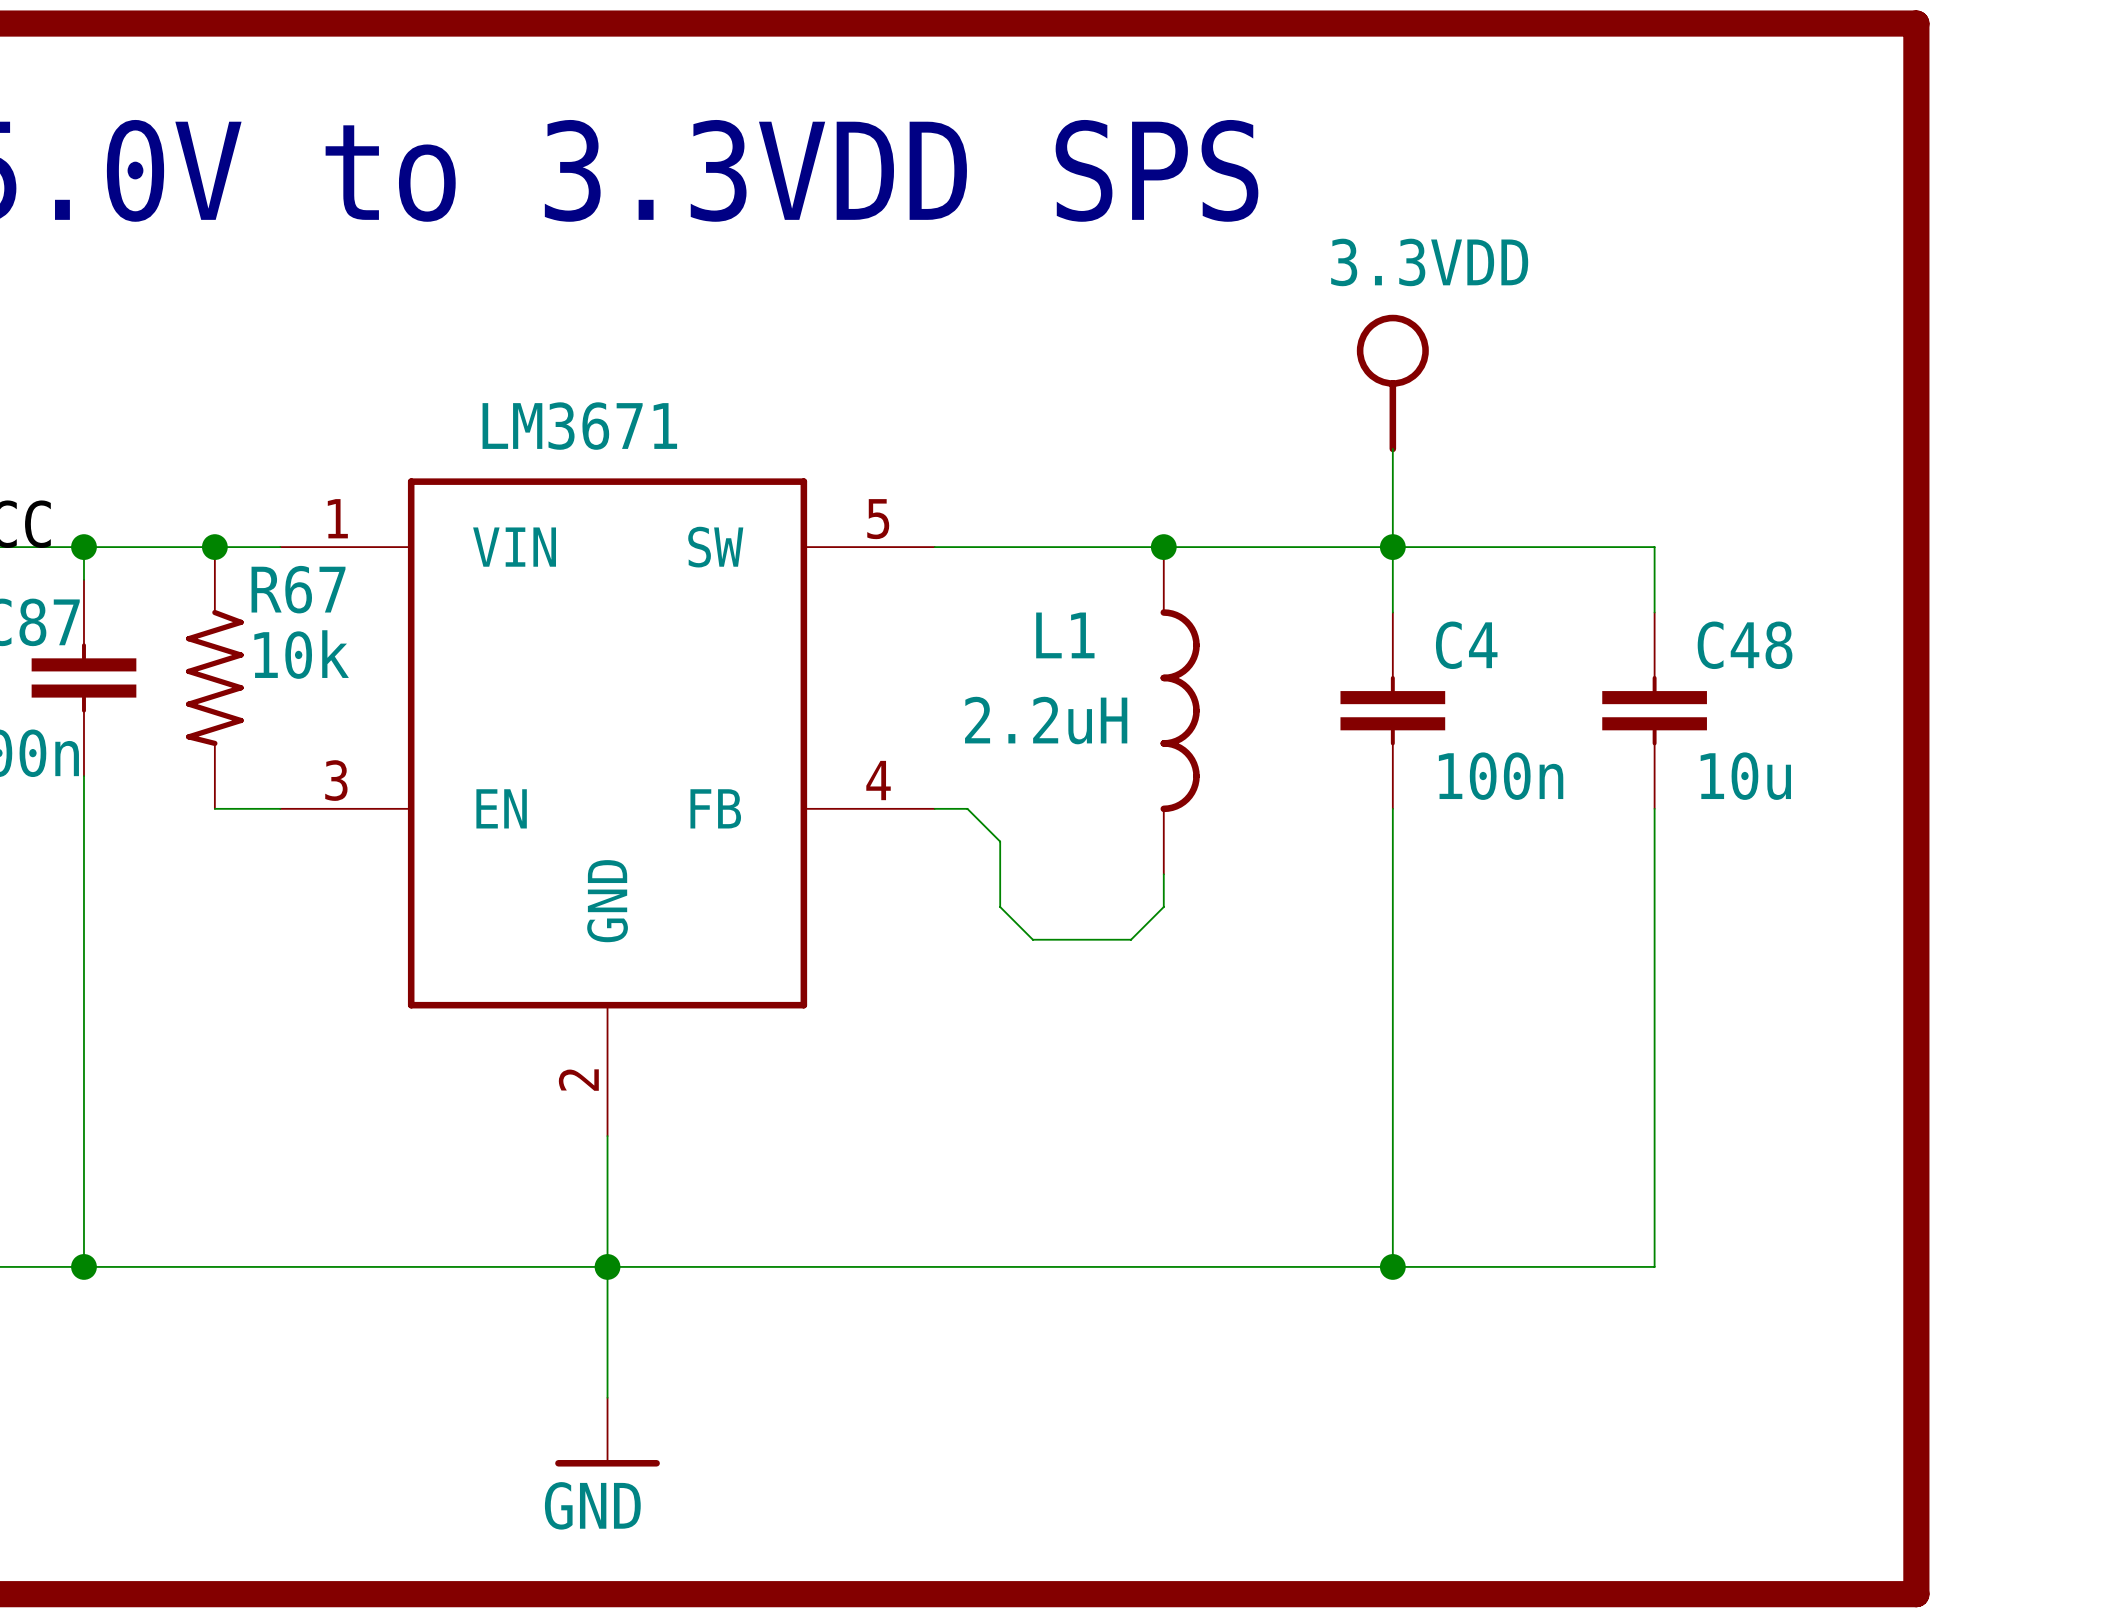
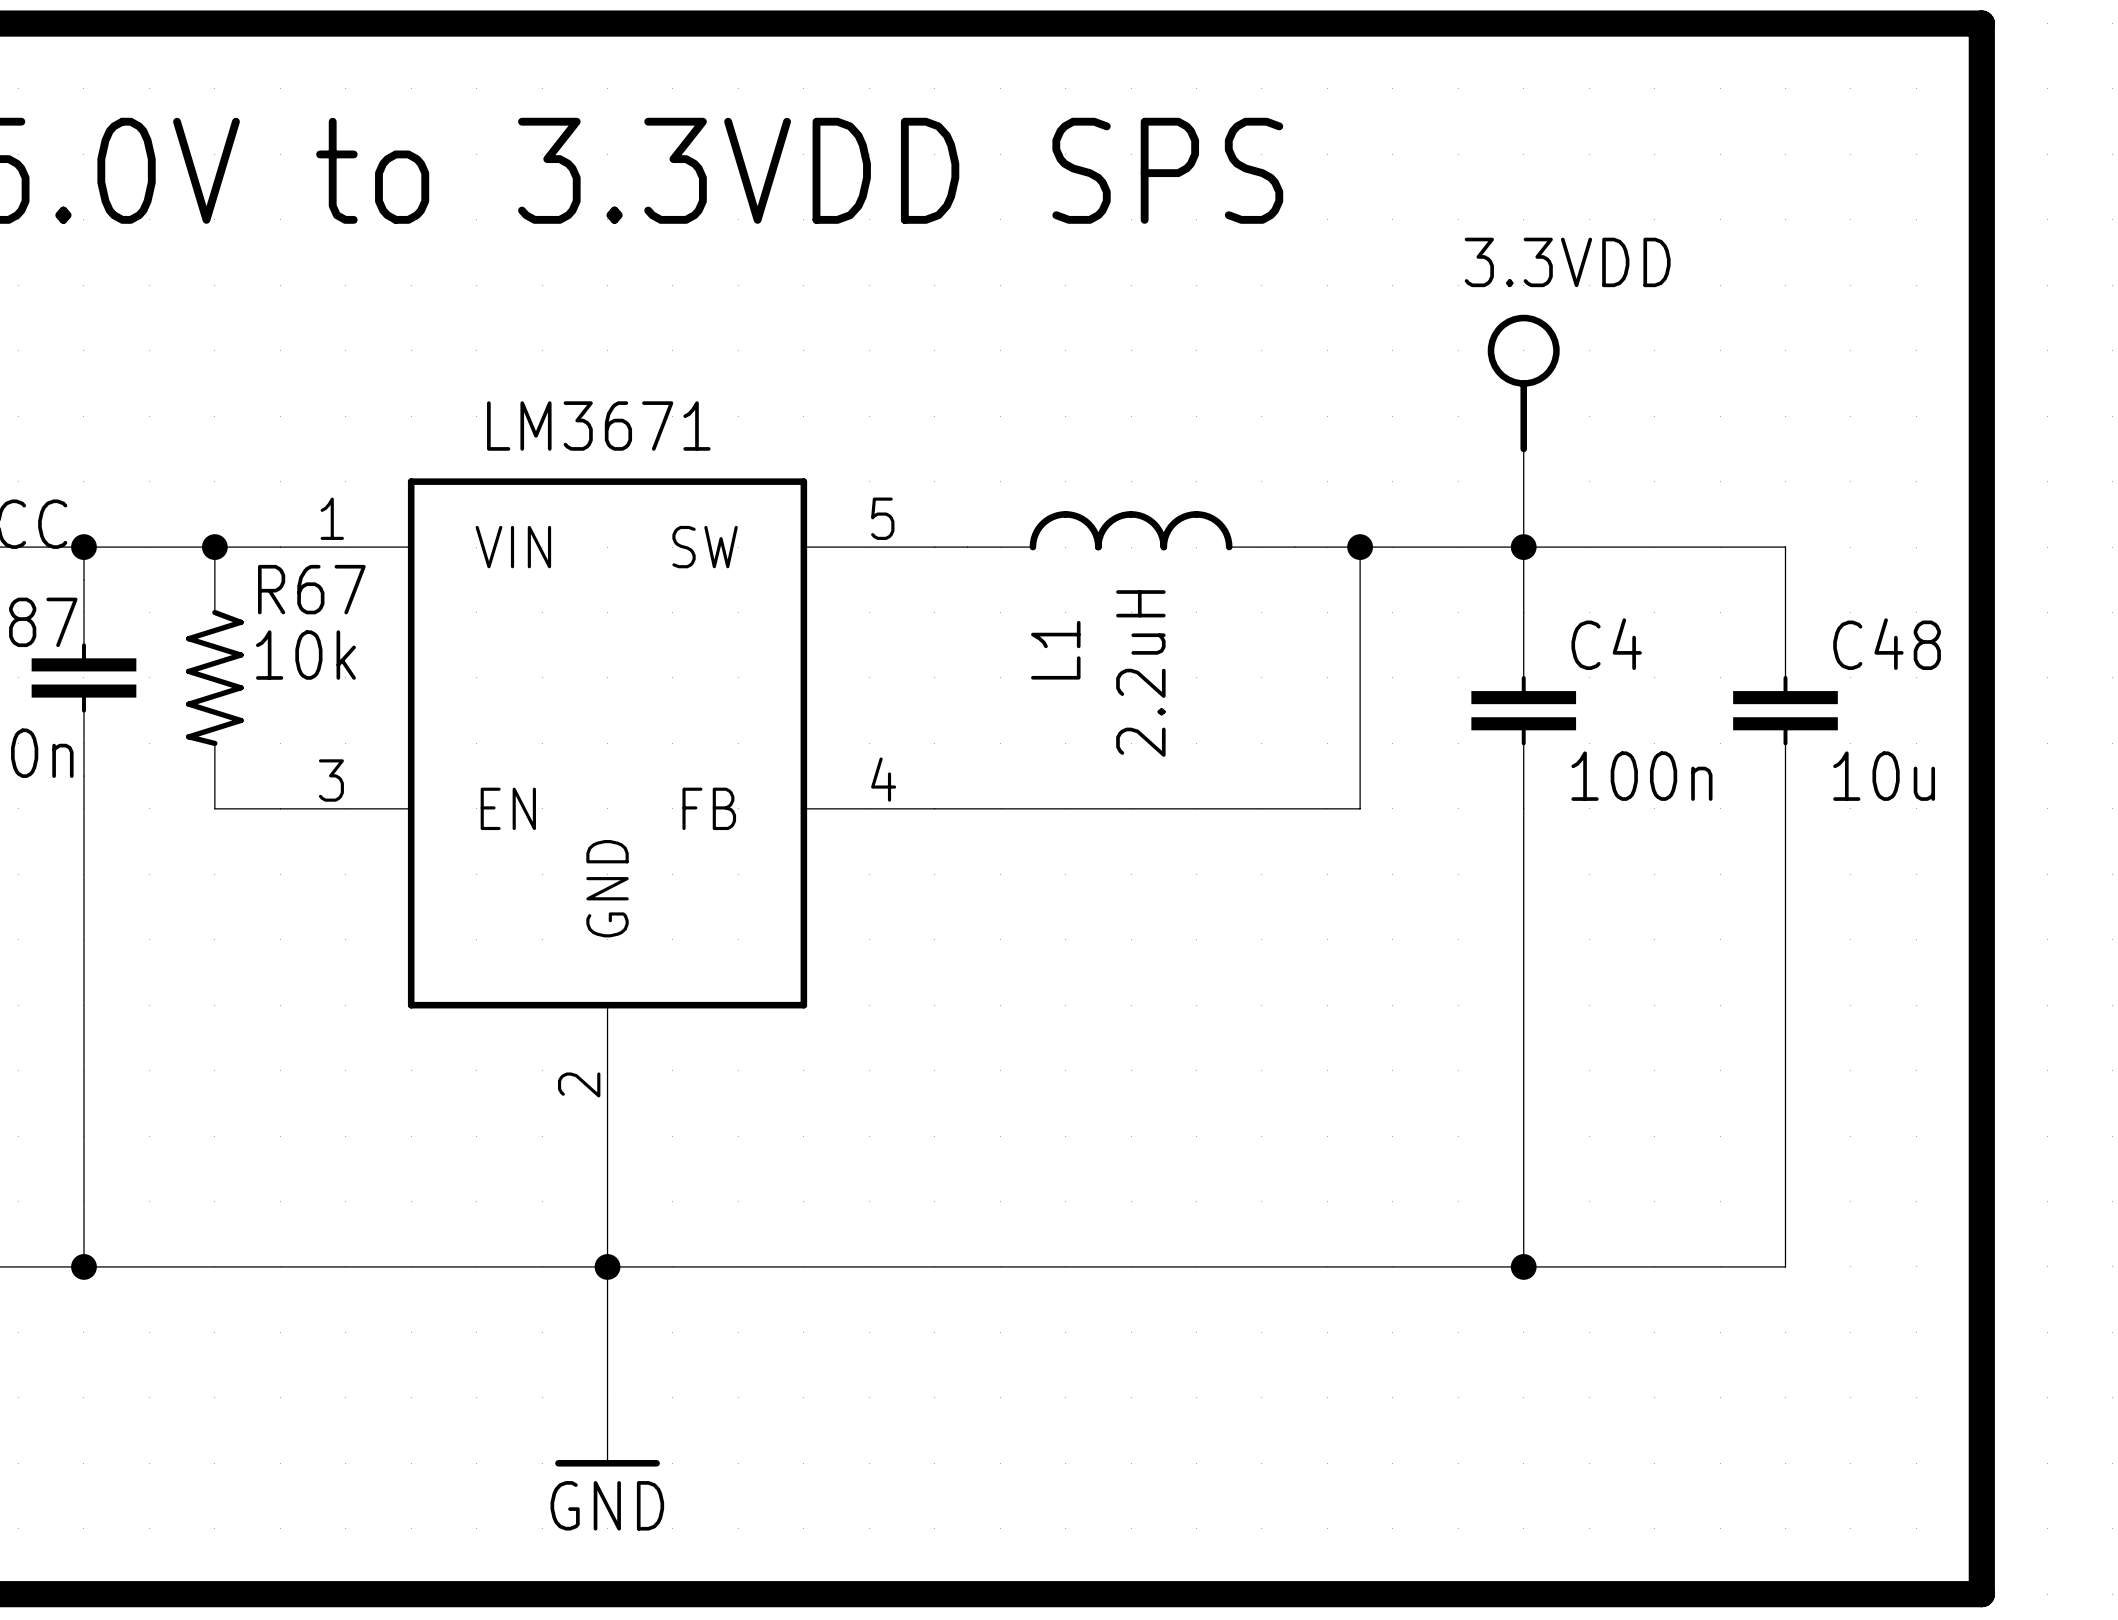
line: (1916, 23) (1916, 1594) -> (1916, 23) (1981, 23) (1981, 1594) (1916, 1594)
power symbol position: 3.3VDD (1392, 383) -> 3.3VDD (1523, 383)
wire: (1392, 448) (1392, 612) -> (1523, 448) (1523, 612)
wire: (967, 547) (1294, 547) -> none
junction: (1163, 547) -> none
junction position: (1392, 547) -> (1360, 547)
junction: none -> (1523, 547)
wire: (1654, 547) (1654, 612) -> (1654, 547) (1785, 547) (1785, 612)
L1 rotation: 0° (1180, 710) -> 90° counterclockwise (1131, 530)
C4 position: (1392, 710) -> (1523, 710)
C48 position: (1654, 710) -> (1785, 710)
wire: (967, 808) (1000, 841) (1000, 907) (1032, 939) (1131, 939) (1163, 907) (1163, 874) -> (967, 808) (1360, 808) (1360, 547)
wire: (1392, 808) (1392, 1266) -> (1523, 808) (1523, 1266)
wire: (1654, 808) (1654, 1266) -> (1785, 808) (1785, 1266) (1654, 1266)
junction position: (1392, 1266) -> (1523, 1266)

